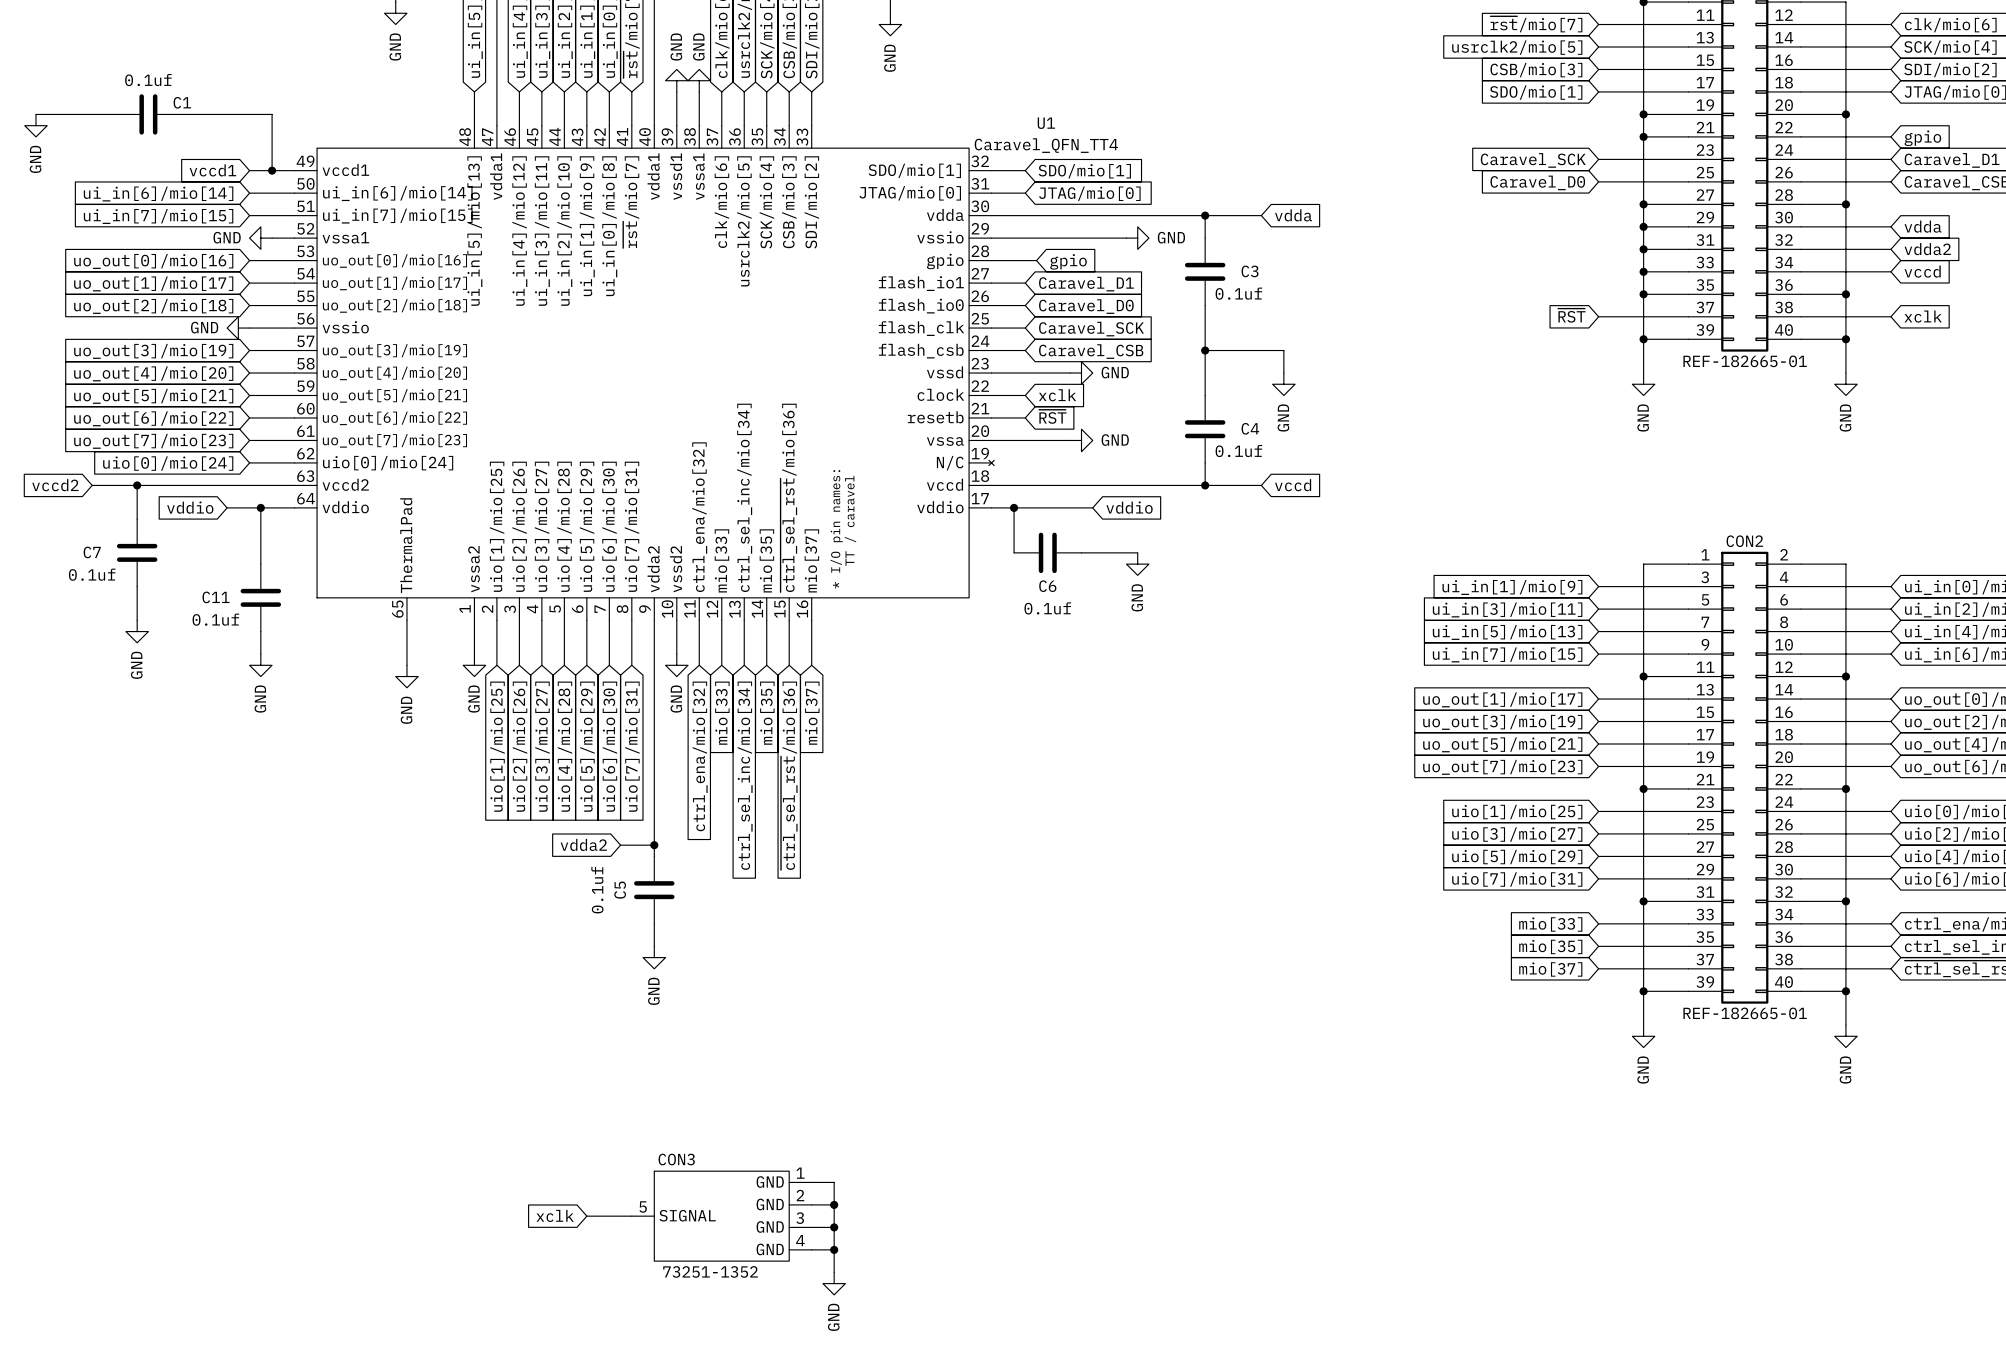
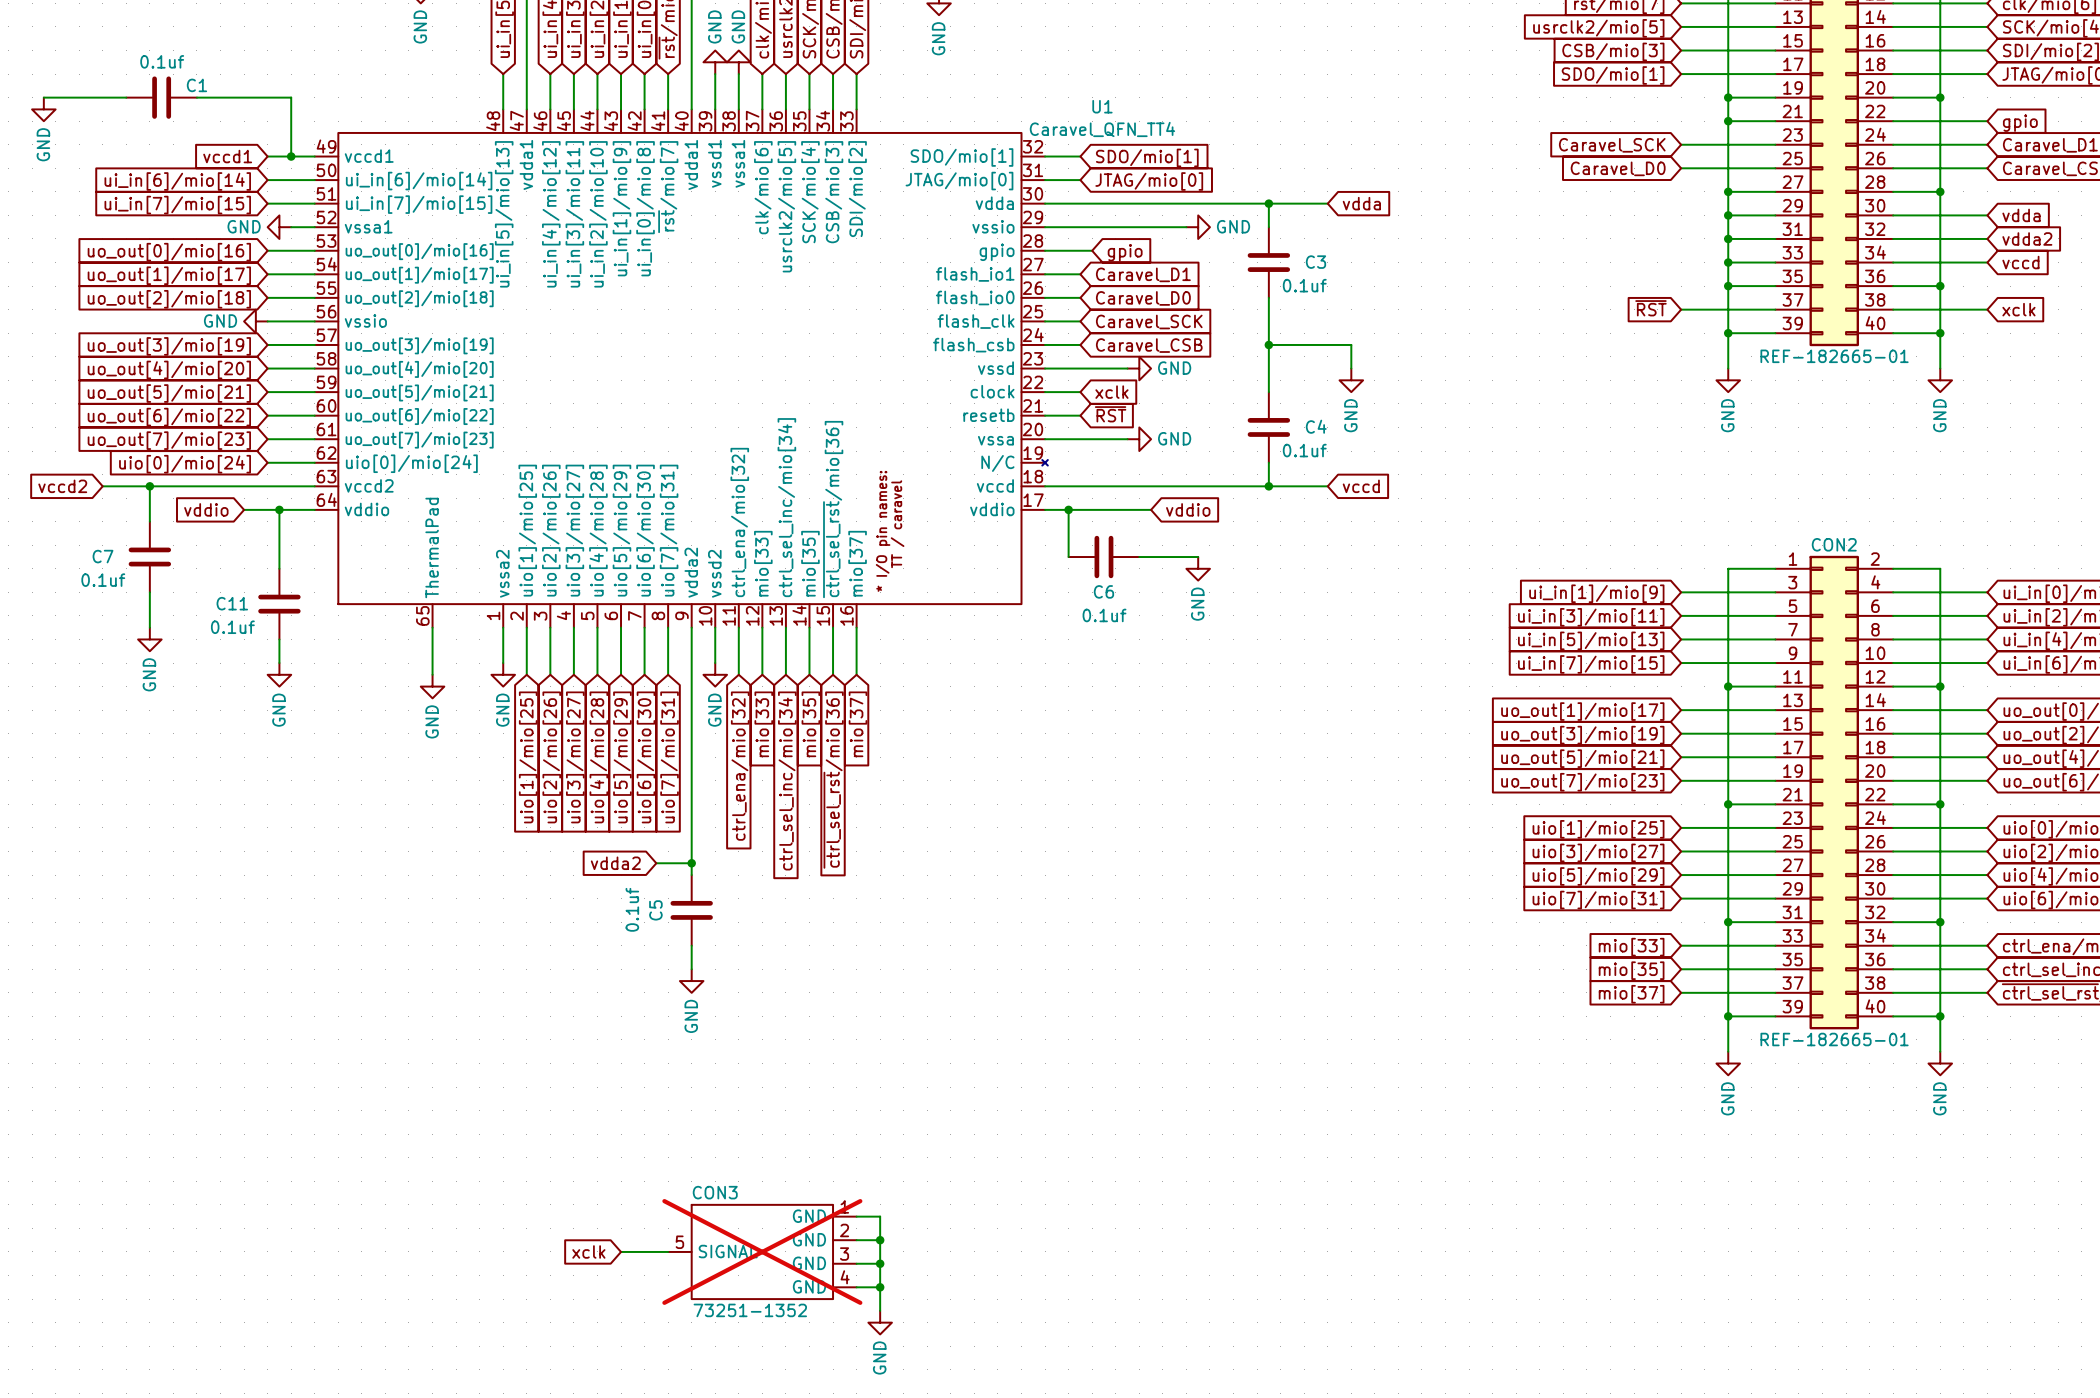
CON3 do-not-place cross: none -> (762, 1251)

